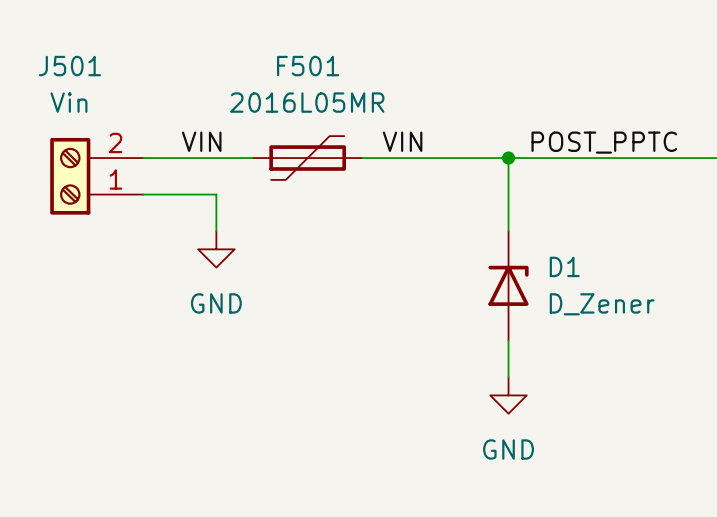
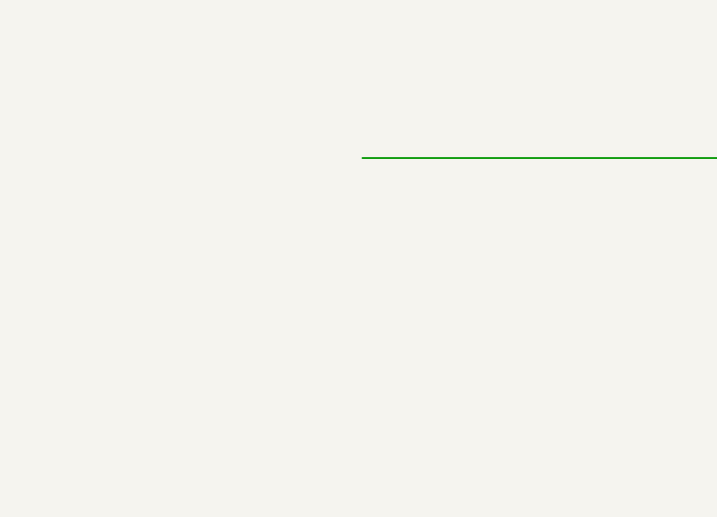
label: VIN (201, 141) -> none
label: VIN (402, 141) -> none
label: POST_PPTC (604, 142) -> none
wire: (143, 158) (252, 158) -> none
F501: 2016L05MR (307, 158) -> none
wire: (508, 158) (508, 231) -> none
junction: (508, 158) -> none
J501: Vin (96, 176) -> none
wire: (143, 194) (216, 194) (216, 231) -> none
power symbol: GND (216, 249) -> none
D1: D_Zener (508, 285) -> none
wire: (508, 340) (508, 377) -> none
power symbol: GND (508, 395) -> none

